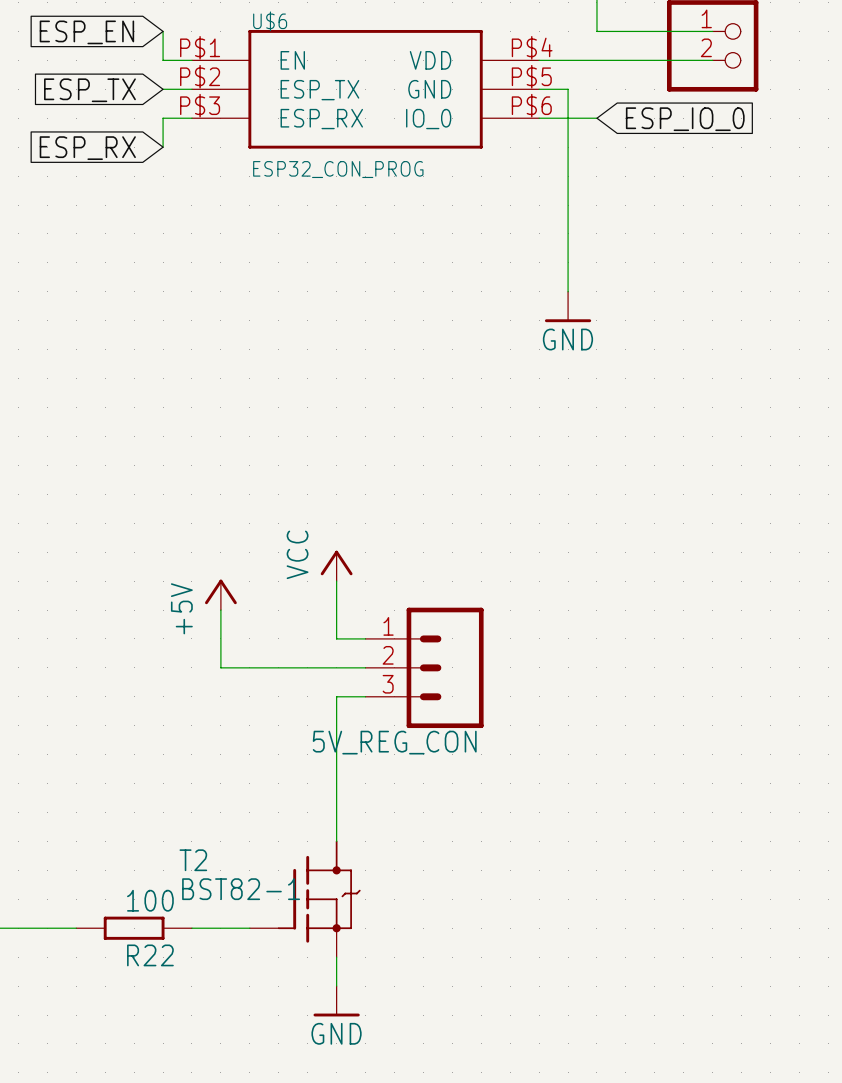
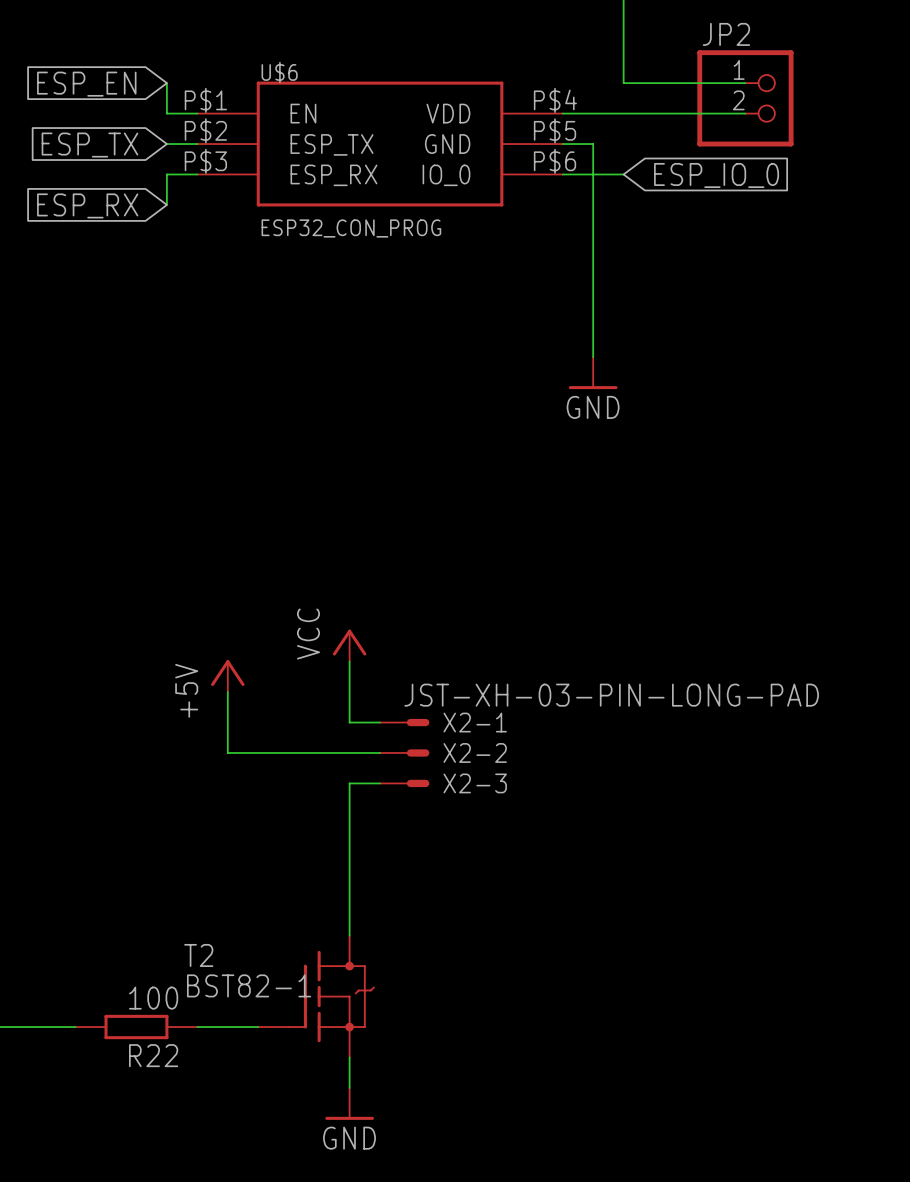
X2-1: none -> JST-XH-03-PIN-LONG-PAD (404, 722)
X2-2: none -> (404, 752)
5V_REG_CON: (424, 667) -> none
X2-3: none -> (404, 783)

